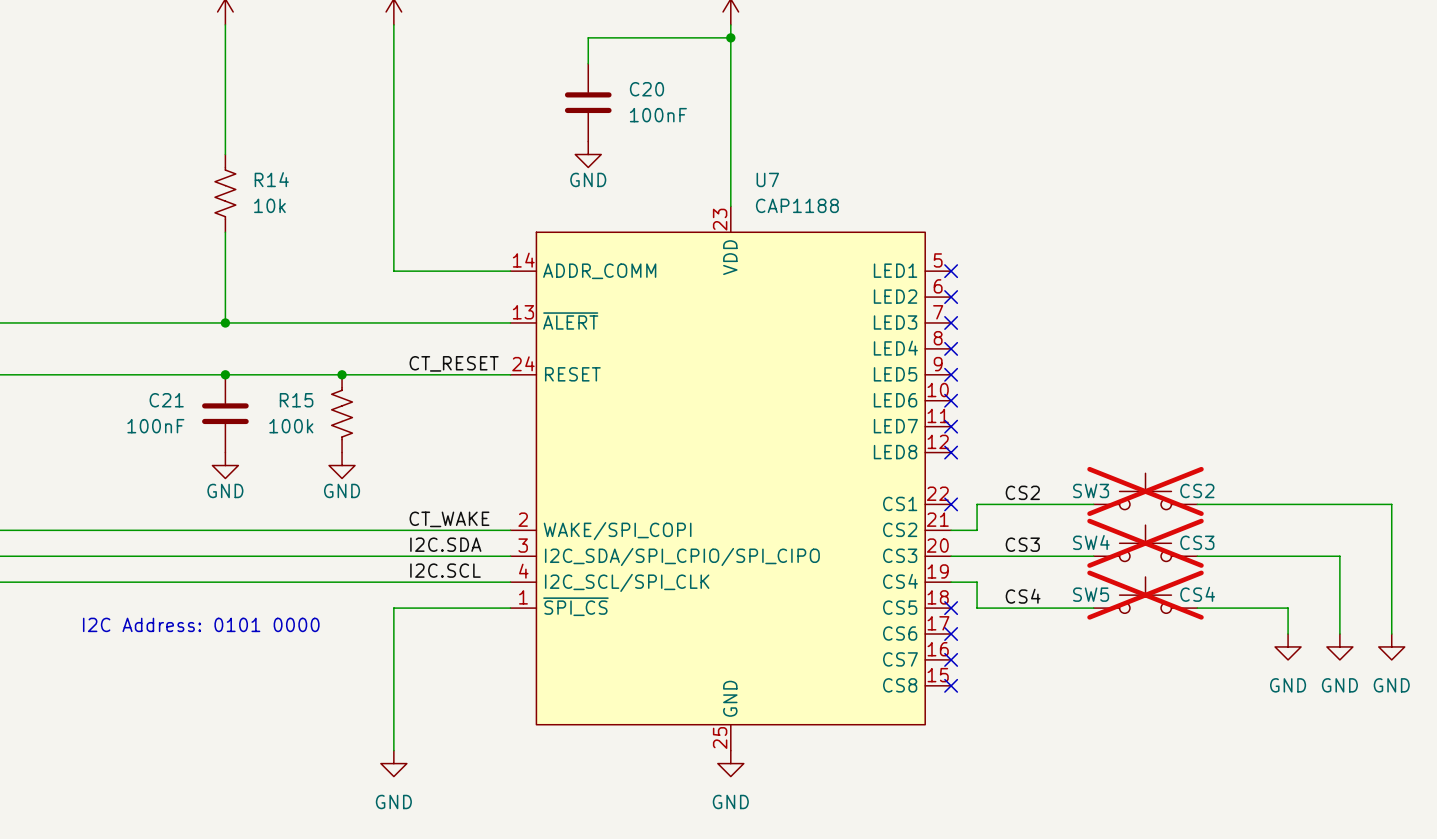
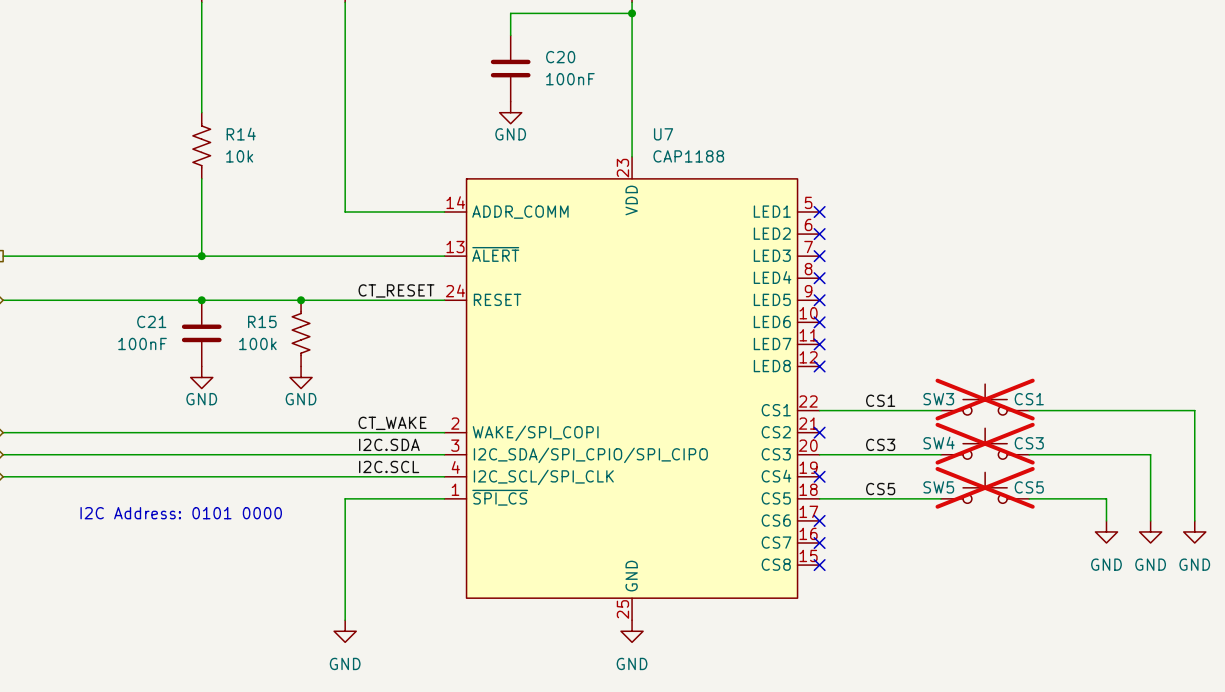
SW3 value: CS2 (1197, 490) -> CS1 (1029, 399)
label: CS2 (1022, 492) -> CS1 (880, 400)
no-connect mark position: (951, 504) -> (819, 432)
wire: (977, 504) (977, 530) (951, 530) -> (841, 410) (819, 410)
wire: (951, 582) (977, 582) (977, 608) -> (819, 498) (841, 498)
SW5 value: CS4 (1197, 594) -> CS5 (1029, 487)
label: CS4 (1023, 596) -> CS5 (880, 489)
no-connect mark position: (951, 608) -> (819, 476)

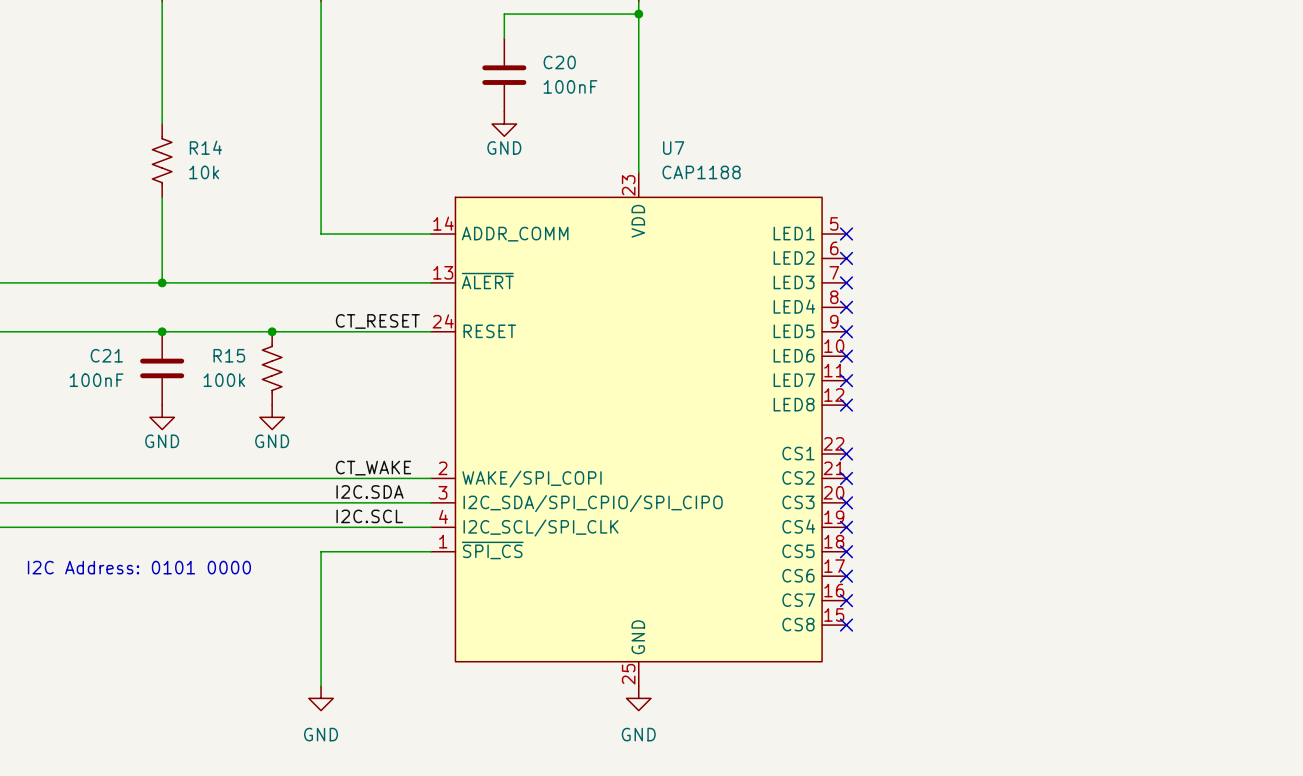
SW3: CS1 (985, 399) -> none
label: CS1 (880, 400) -> none
wire: (819, 410) (940, 410) -> none
no-connect mark: none -> (846, 453)
wire: (1029, 410) (1194, 410) (1194, 520) -> none
SW4: CS3 (985, 443) -> none
label: CS3 (880, 444) -> none
wire: (819, 454) (940, 454) -> none
no-connect mark: none -> (846, 502)
wire: (1029, 454) (1150, 454) (1150, 520) -> none
SW5: CS5 (985, 487) -> none
label: CS5 (880, 489) -> none
wire: (819, 498) (940, 498) -> none
no-connect mark: none -> (846, 551)
wire: (1029, 498) (1106, 498) (1106, 520) -> none
power symbol: GND (1106, 531) -> none
power symbol: GND (1150, 531) -> none
power symbol: GND (1194, 531) -> none

